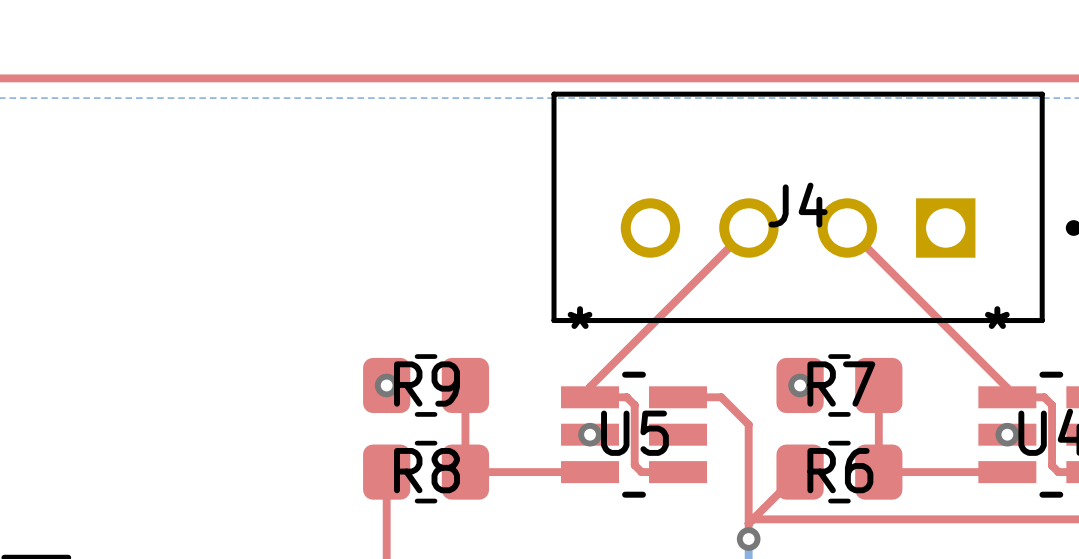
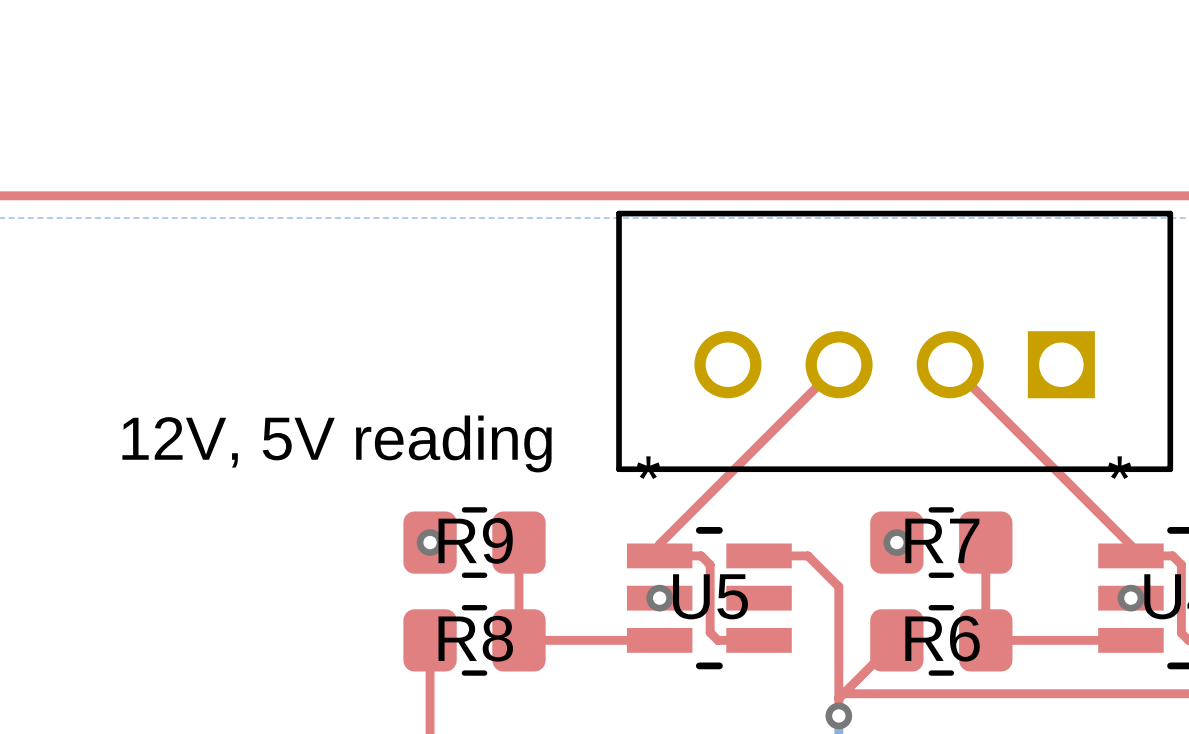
J4 name: J4 (798, 205) -> 12V, 5V reading (337, 443)

